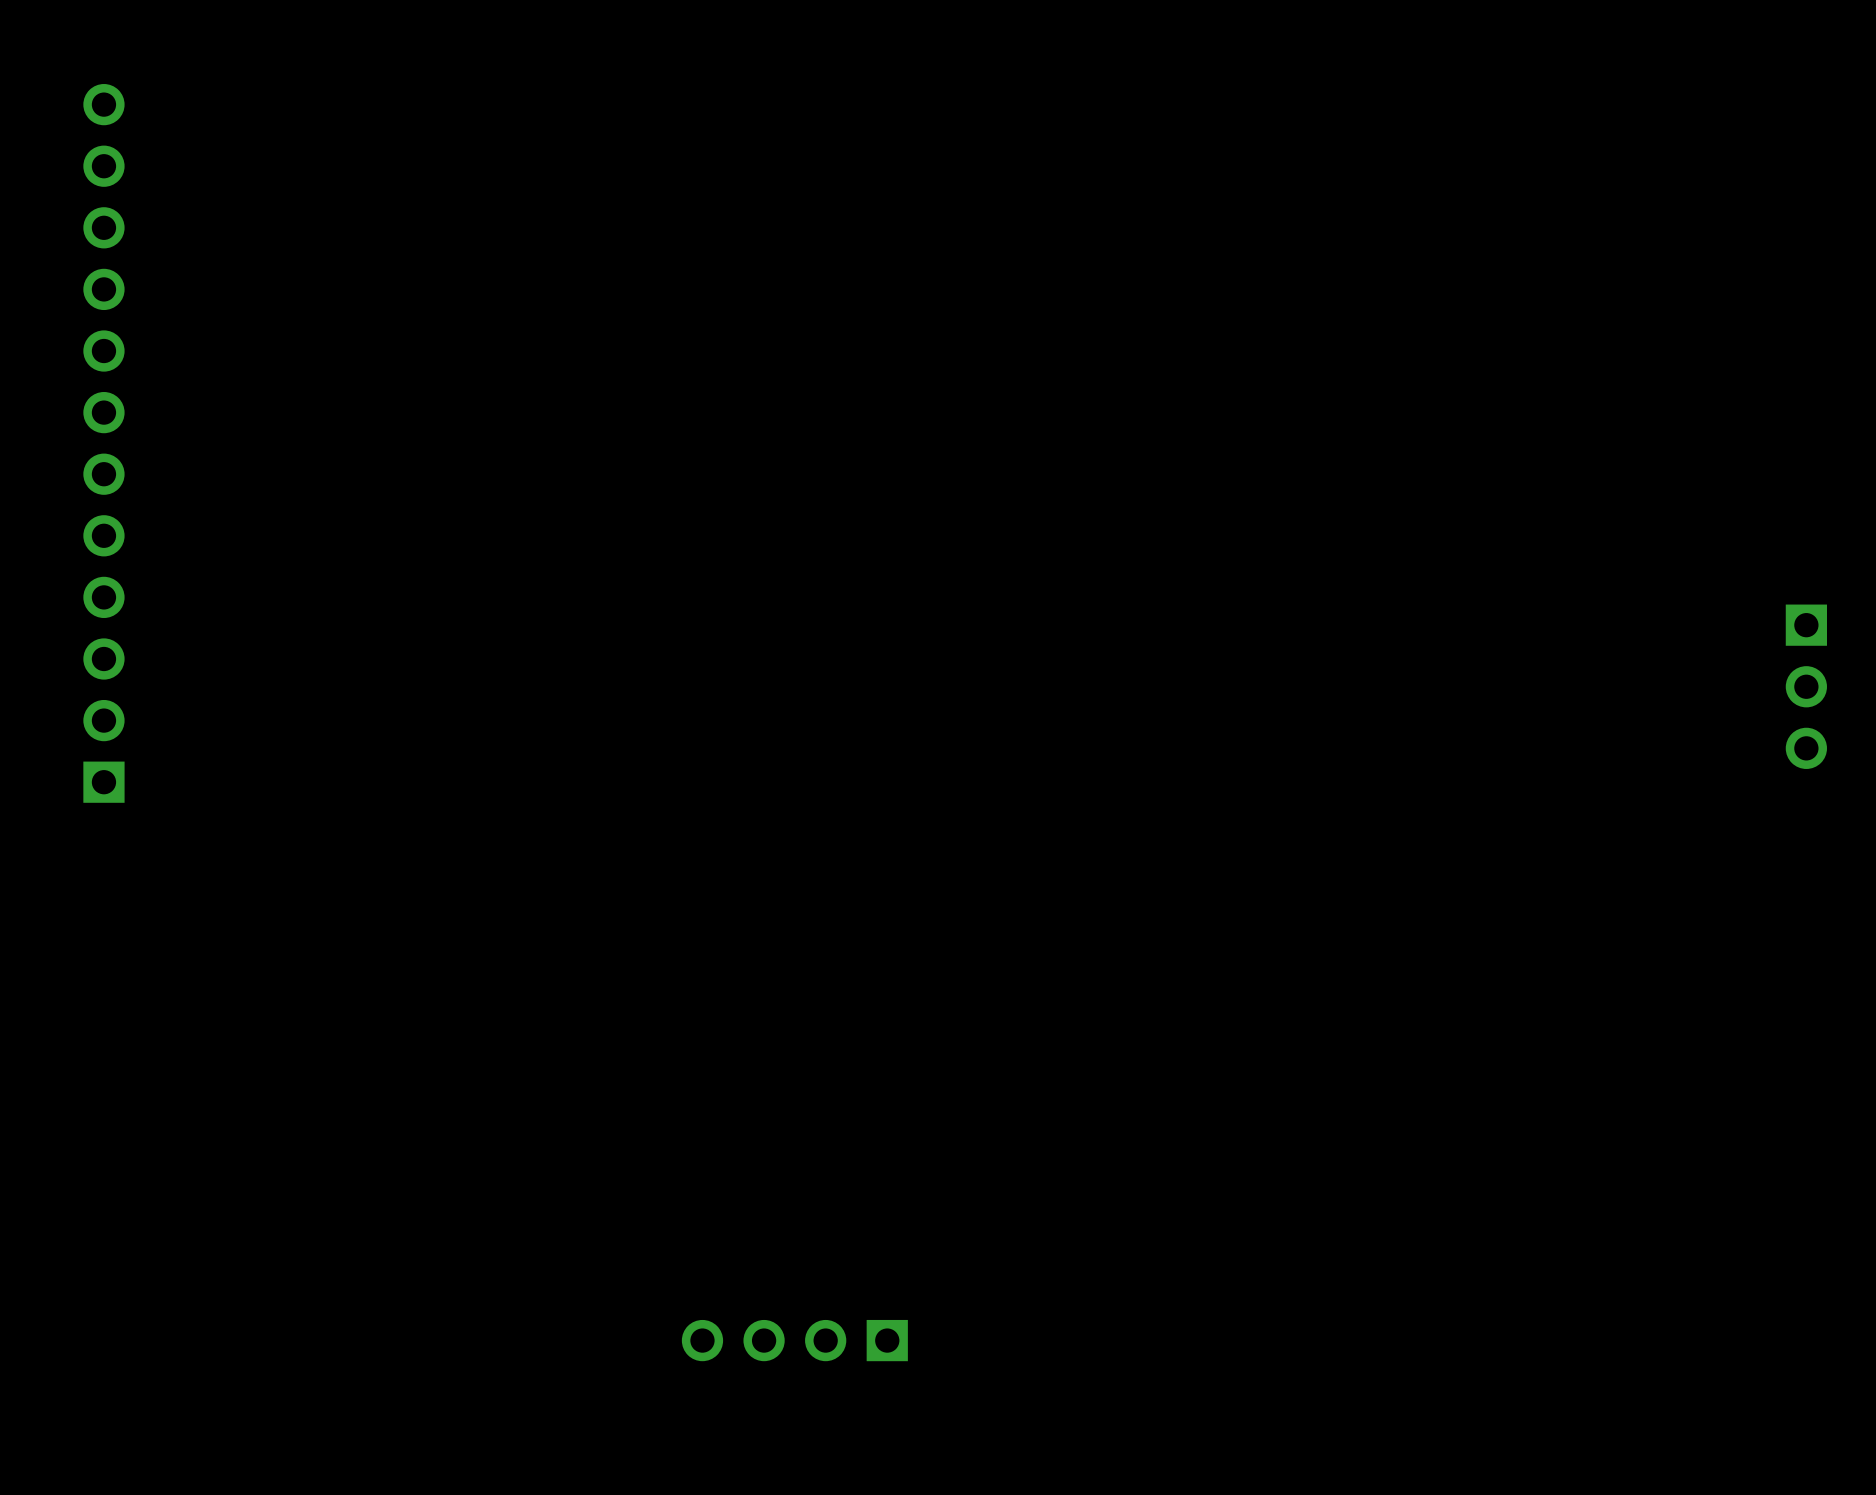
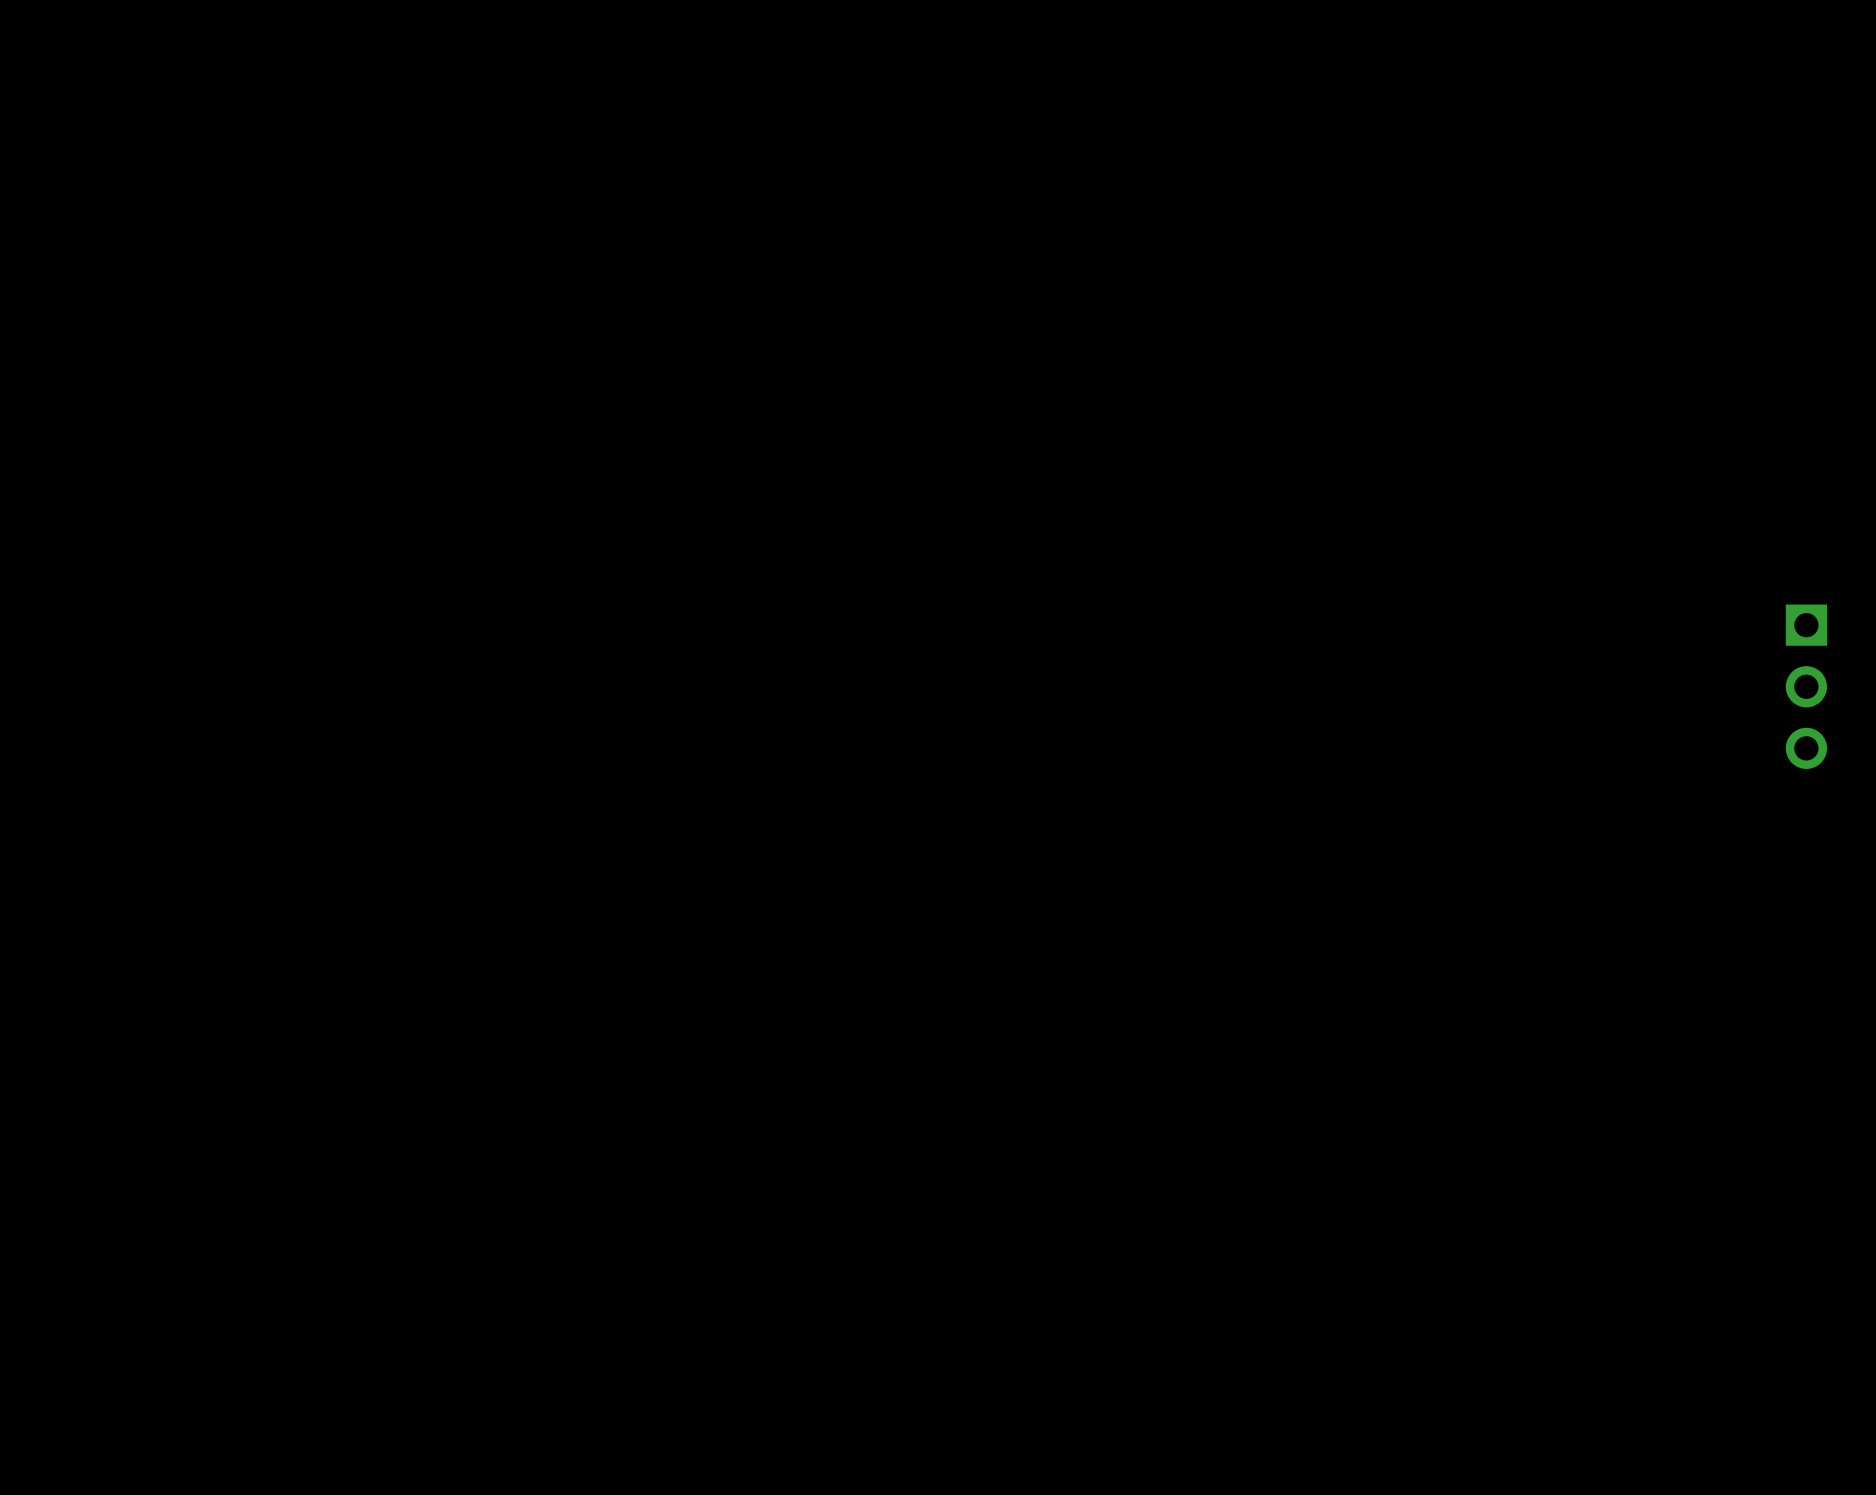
part: (103, 443) -> none
part: (794, 1340) -> none

